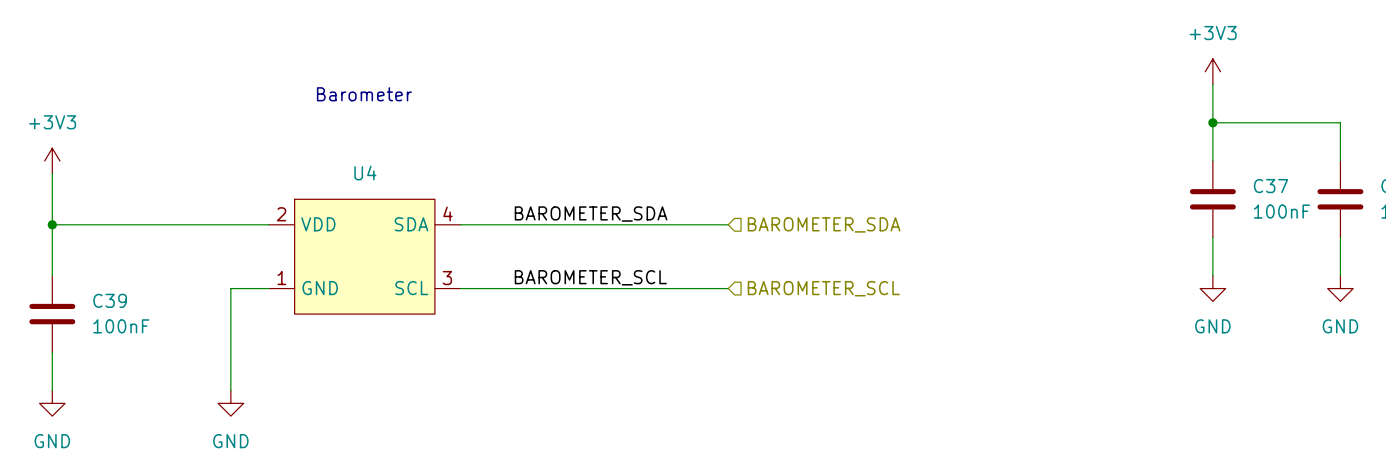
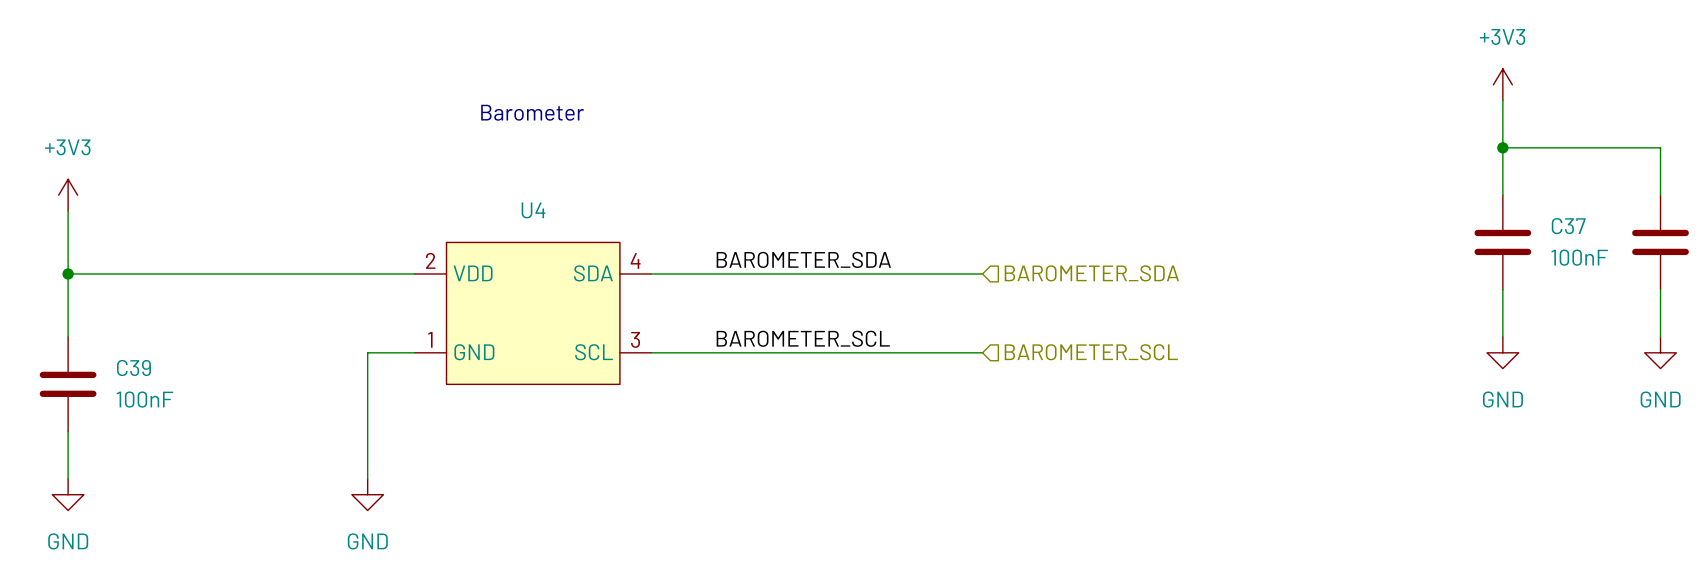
text position: Barometer (364, 94) -> Barometer (532, 112)
label position: BAROMETER_SDA (591, 214) -> BAROMETER_SDA (803, 259)
wire: none -> (903, 273) (982, 273)
hierarchical label position: BAROMETER_SDA (824, 224) -> BAROMETER_SDA (1091, 273)
U4 position: (364, 256) -> (533, 313)
label position: BAROMETER_SCL (590, 277) -> BAROMETER_SCL (803, 338)
wire: (269, 288) (230, 288) (230, 390) -> (414, 352) (367, 352) (367, 478)
wire: none -> (903, 352) (982, 352)
hierarchical label position: BAROMETER_SCL (823, 288) -> BAROMETER_SCL (1091, 352)
power symbol position: GND (230, 403) -> GND (367, 494)

